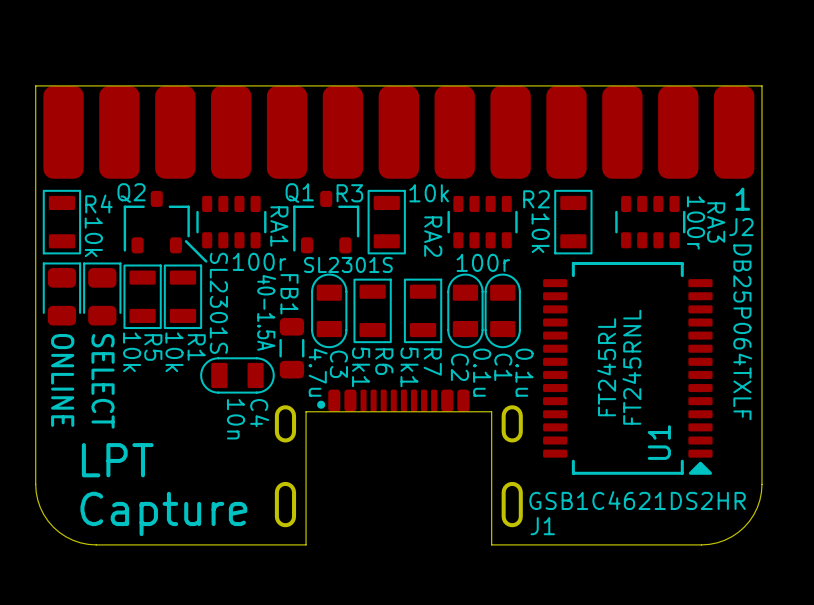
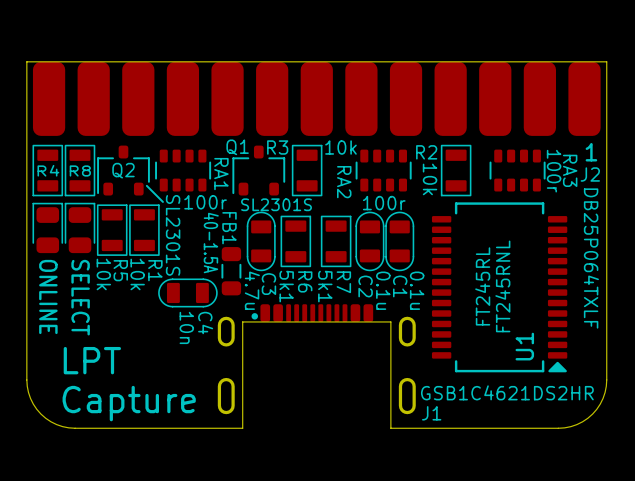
Q2 name position: Q2 (131, 193) -> Q2 (123, 170)
R4 name position: R4 (98, 203) -> R4 (48, 170)
R8: none -> (80, 170)
R4 value: 10k (93, 237) -> none

